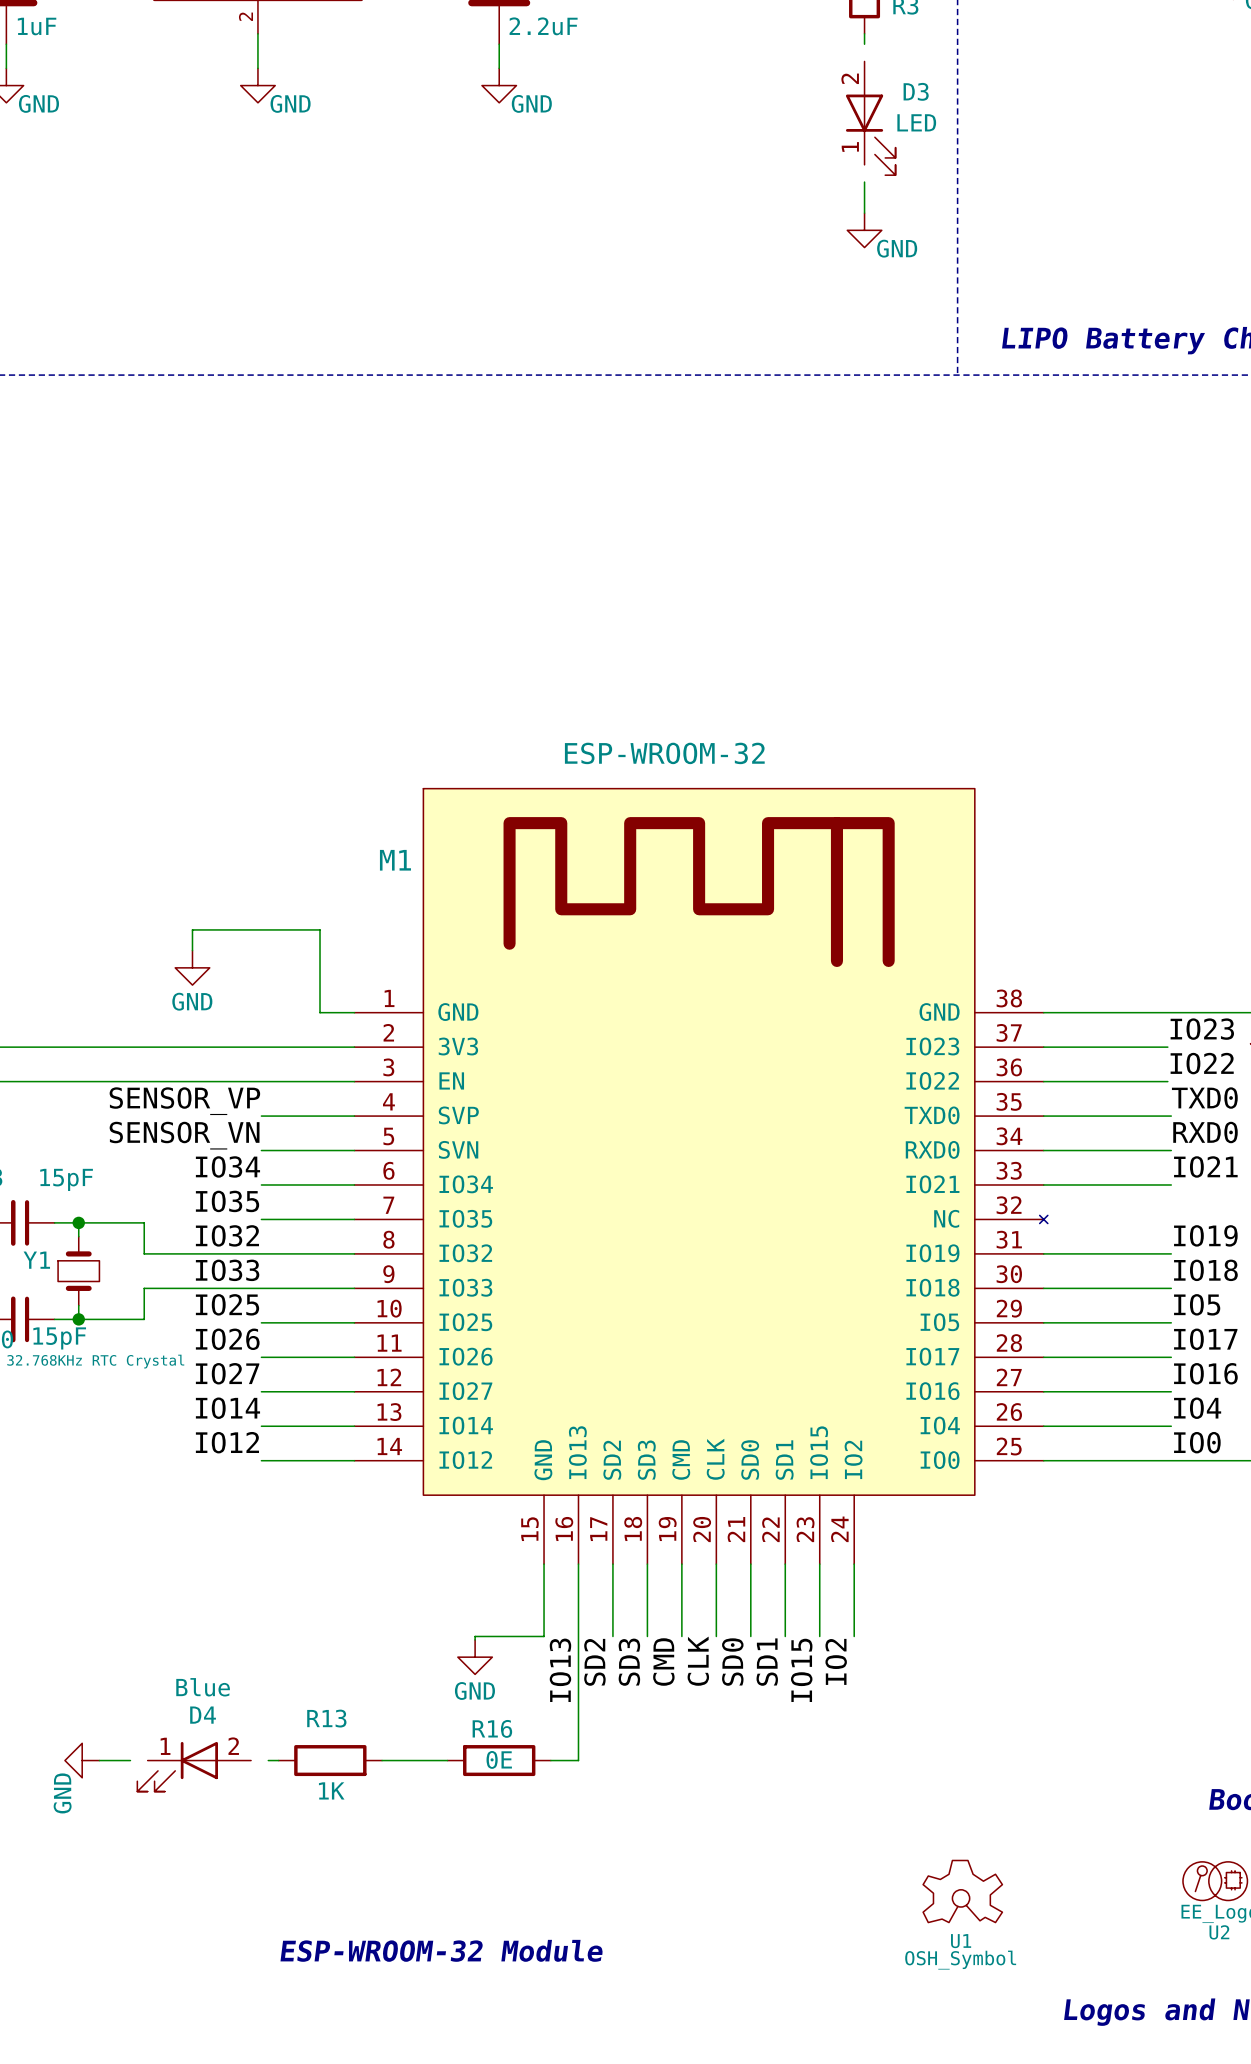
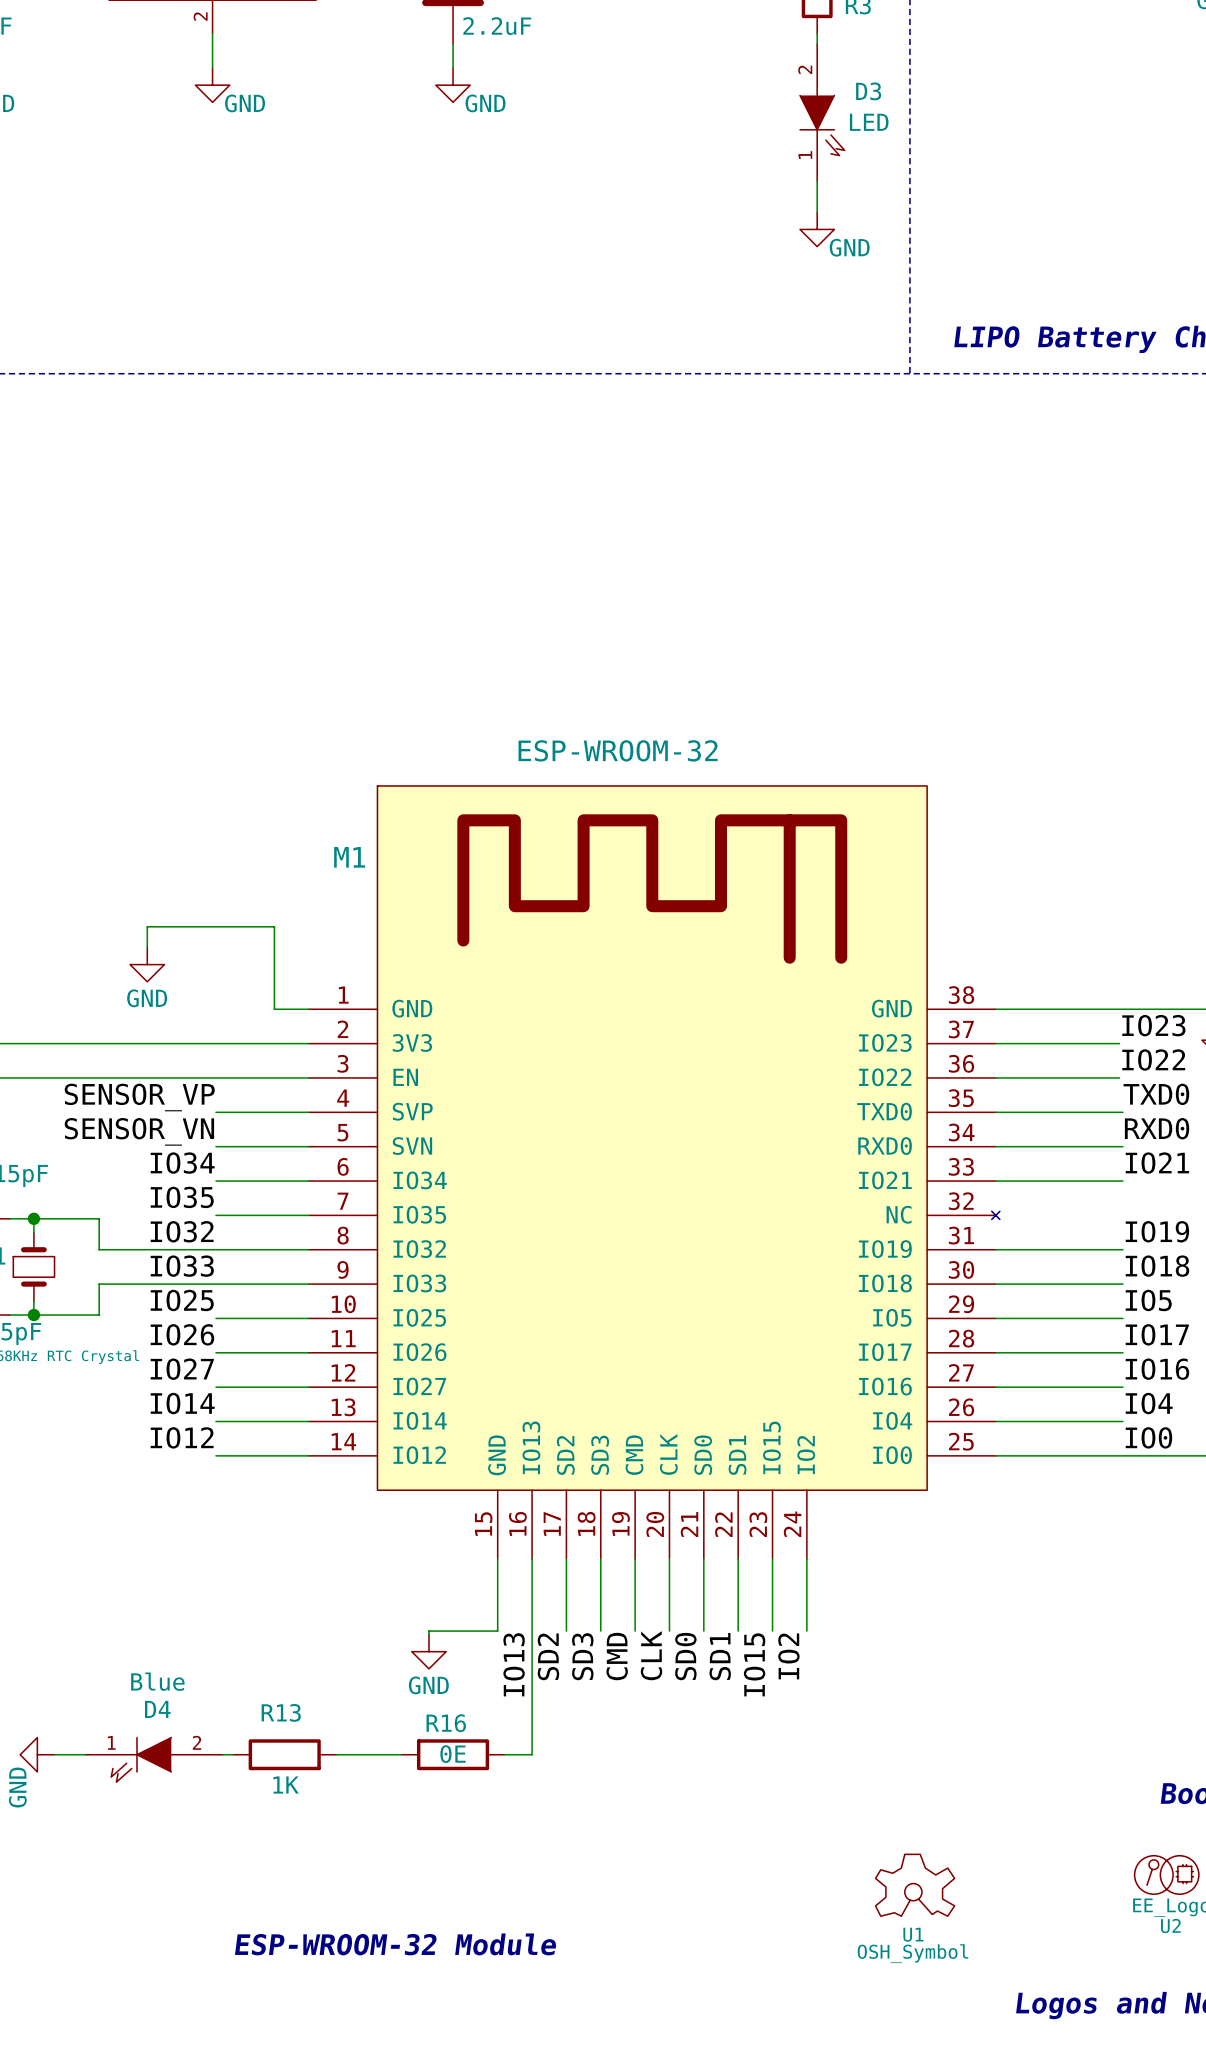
D3 symbol: [845, 61, 896, 176] -> [800, 43, 845, 182]
D4 symbol: [137, 1741, 252, 1792] -> [85, 1737, 223, 1783]

